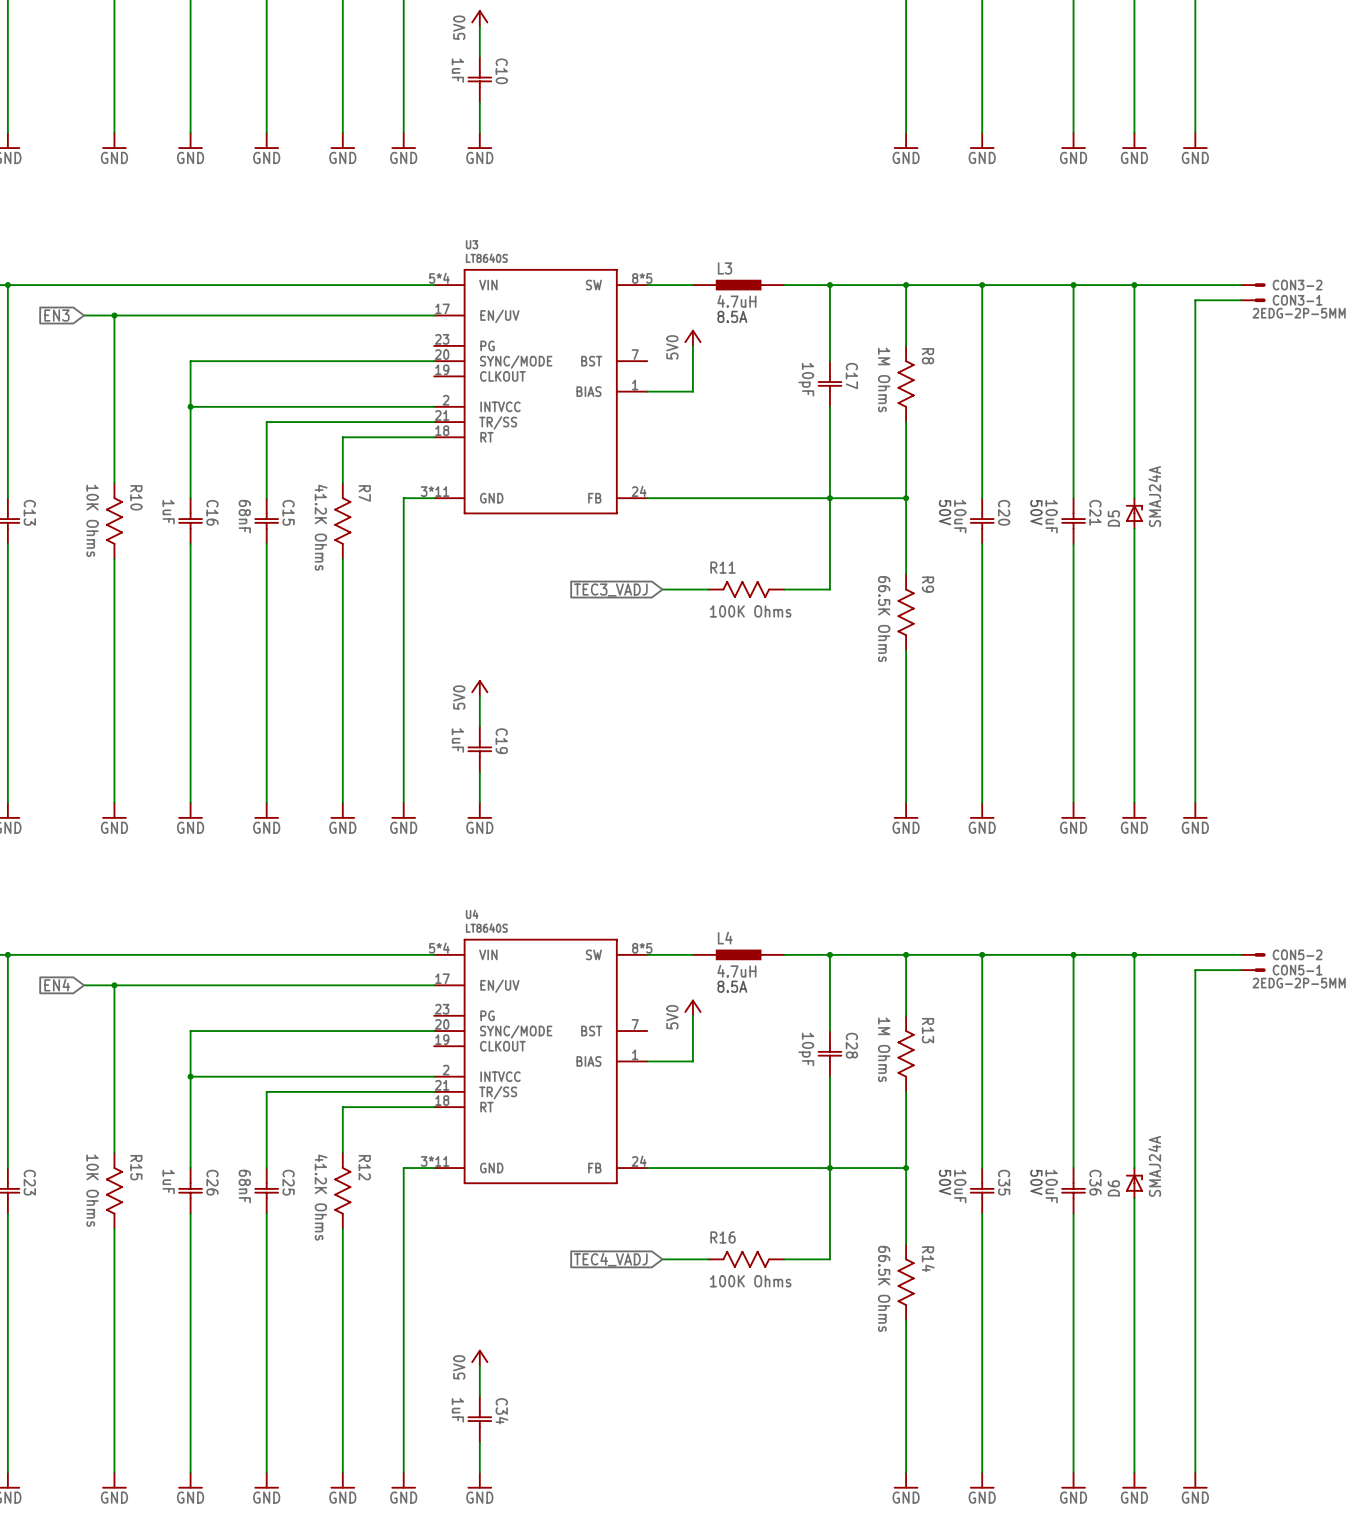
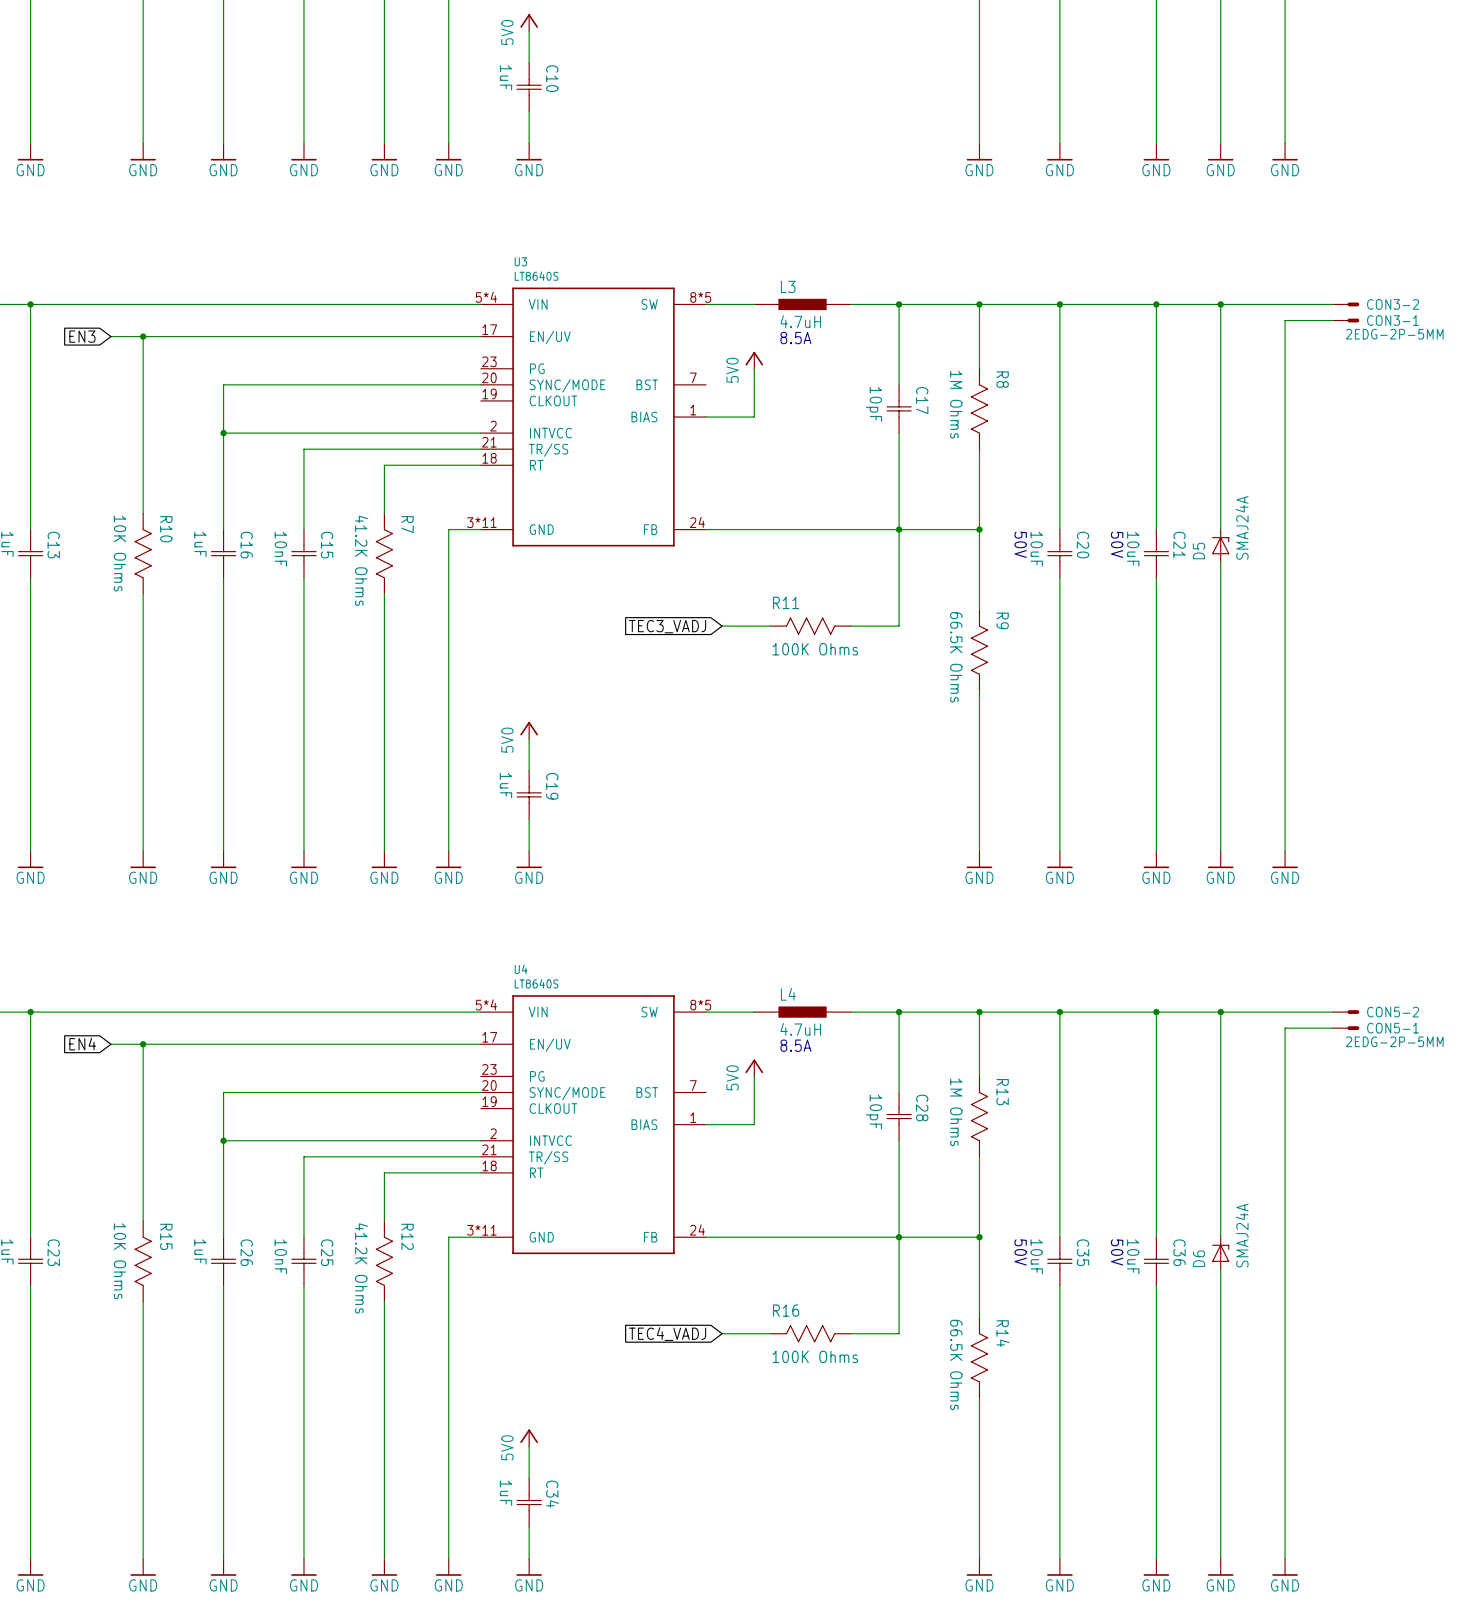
C15 value: 68nF (244, 516) -> 10nF (280, 549)
C25 value: 68nF (244, 1186) -> 10nF (280, 1256)

